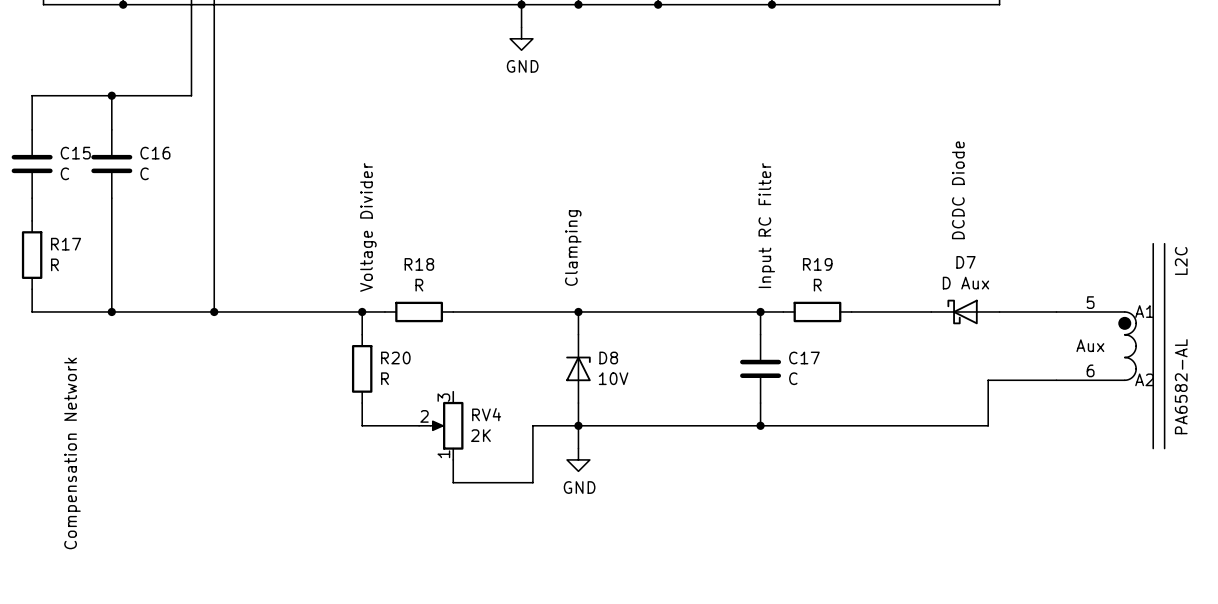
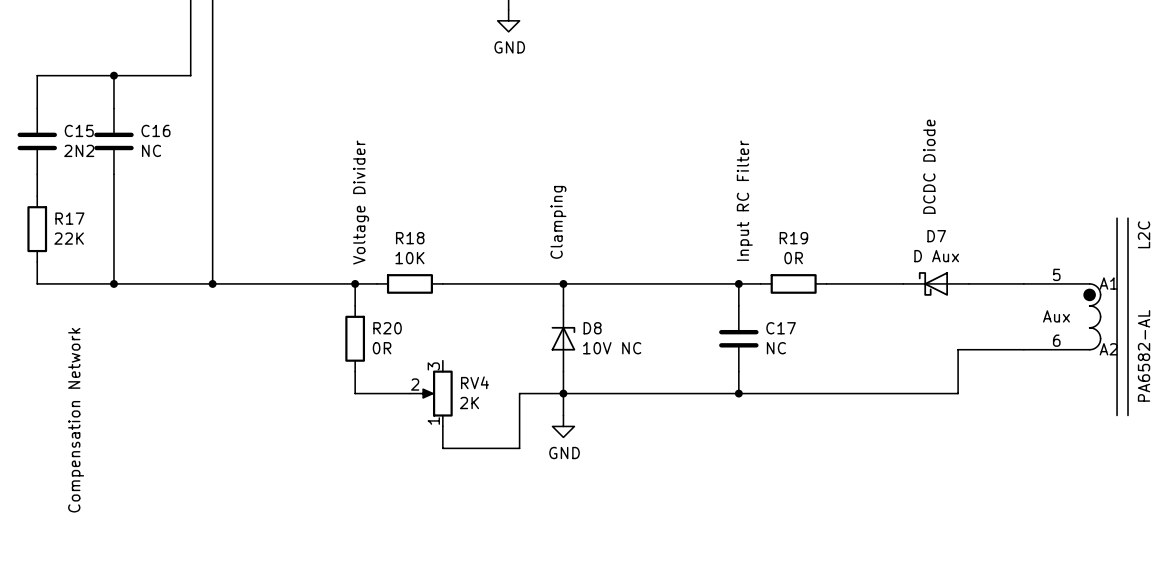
C15 value: C (64, 173) -> 2N2 (79, 150)
C16 value: C (144, 173) -> NC (151, 150)
R17 value: R (54, 264) -> 22K (69, 238)
R18 value: R (419, 285) -> 10K (409, 258)
R19 value: R (817, 285) -> 0R (793, 258)
R20 value: R (385, 378) -> 0R (382, 348)
D8 value: 10V (613, 378) -> 10V NC (612, 348)
C17 value: C (793, 378) -> NC (776, 348)

